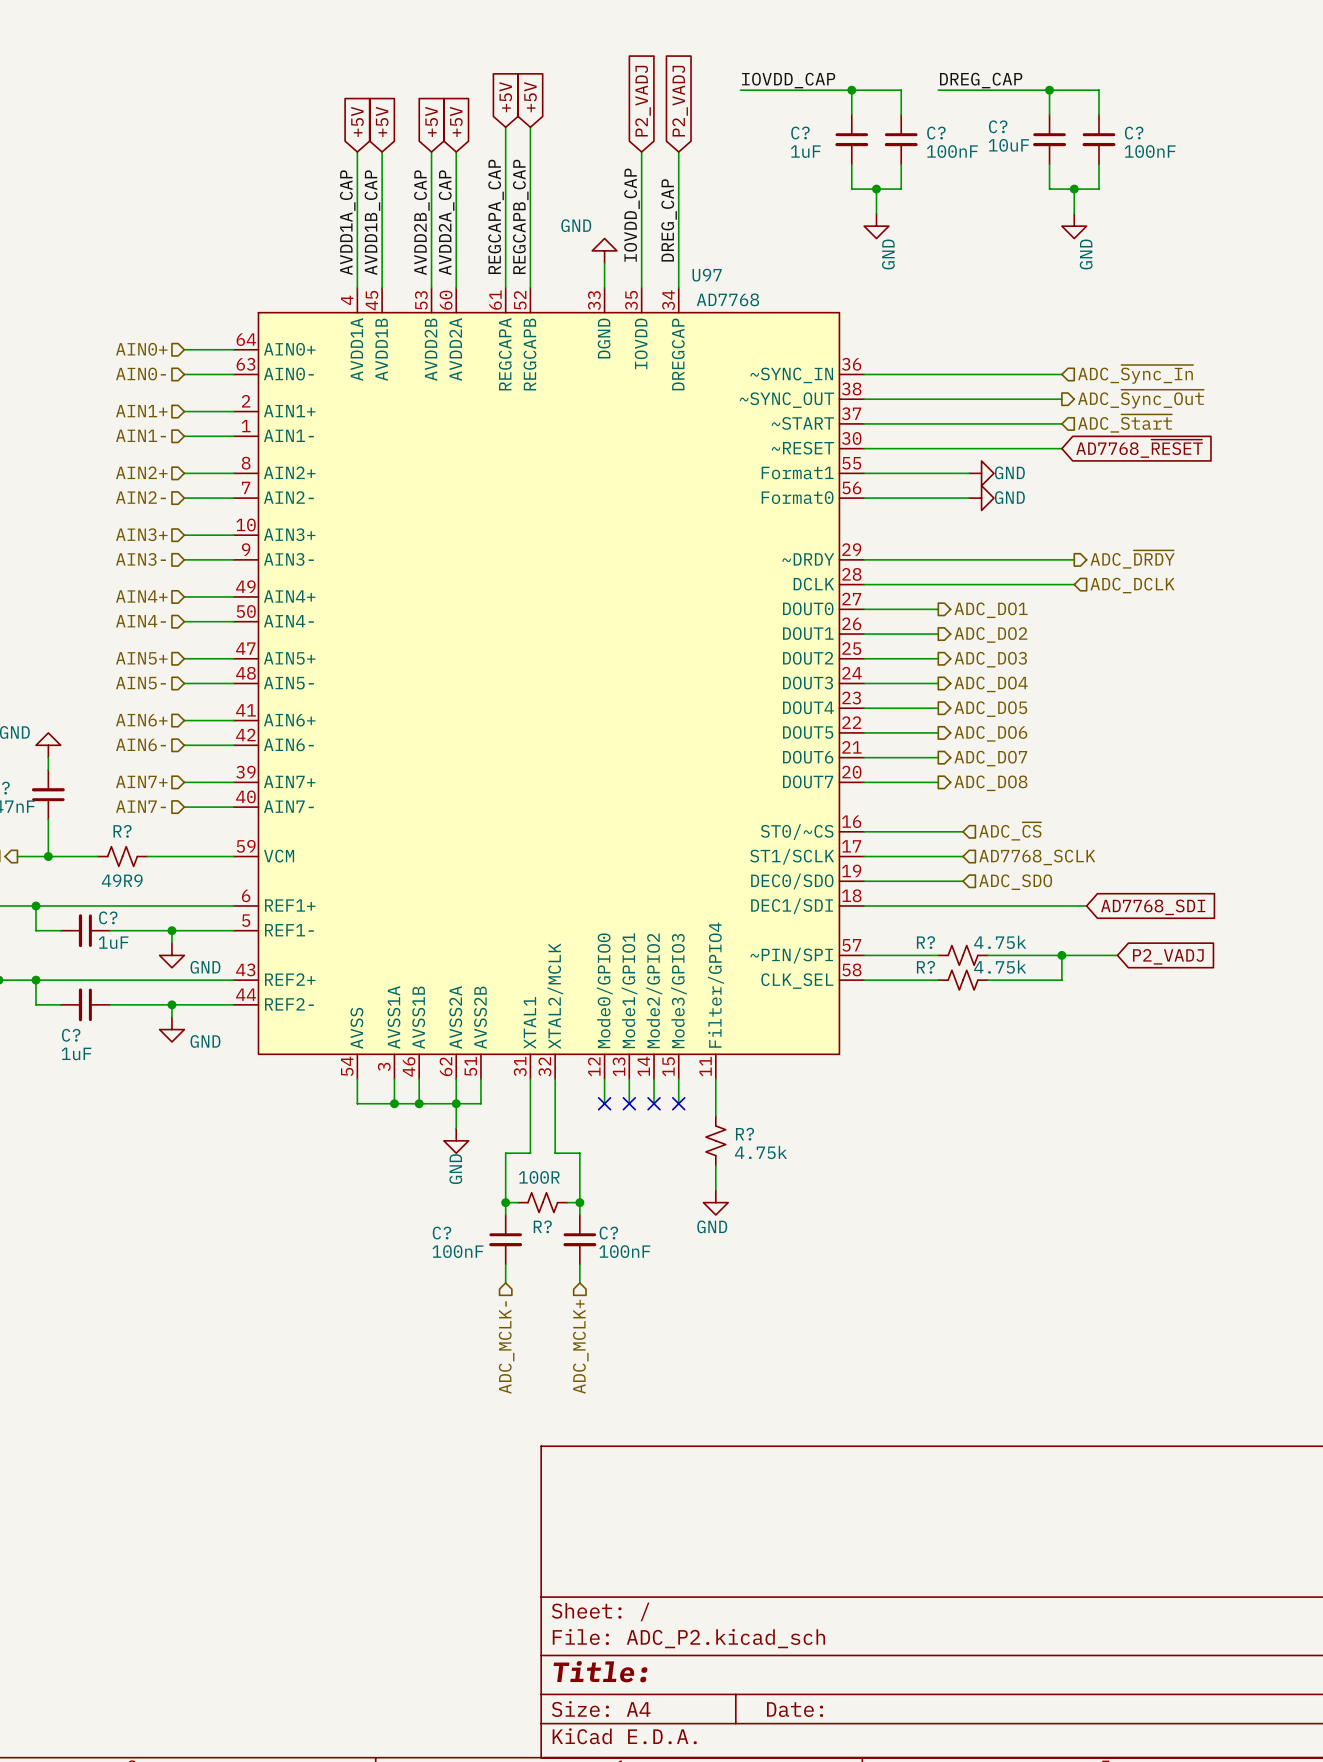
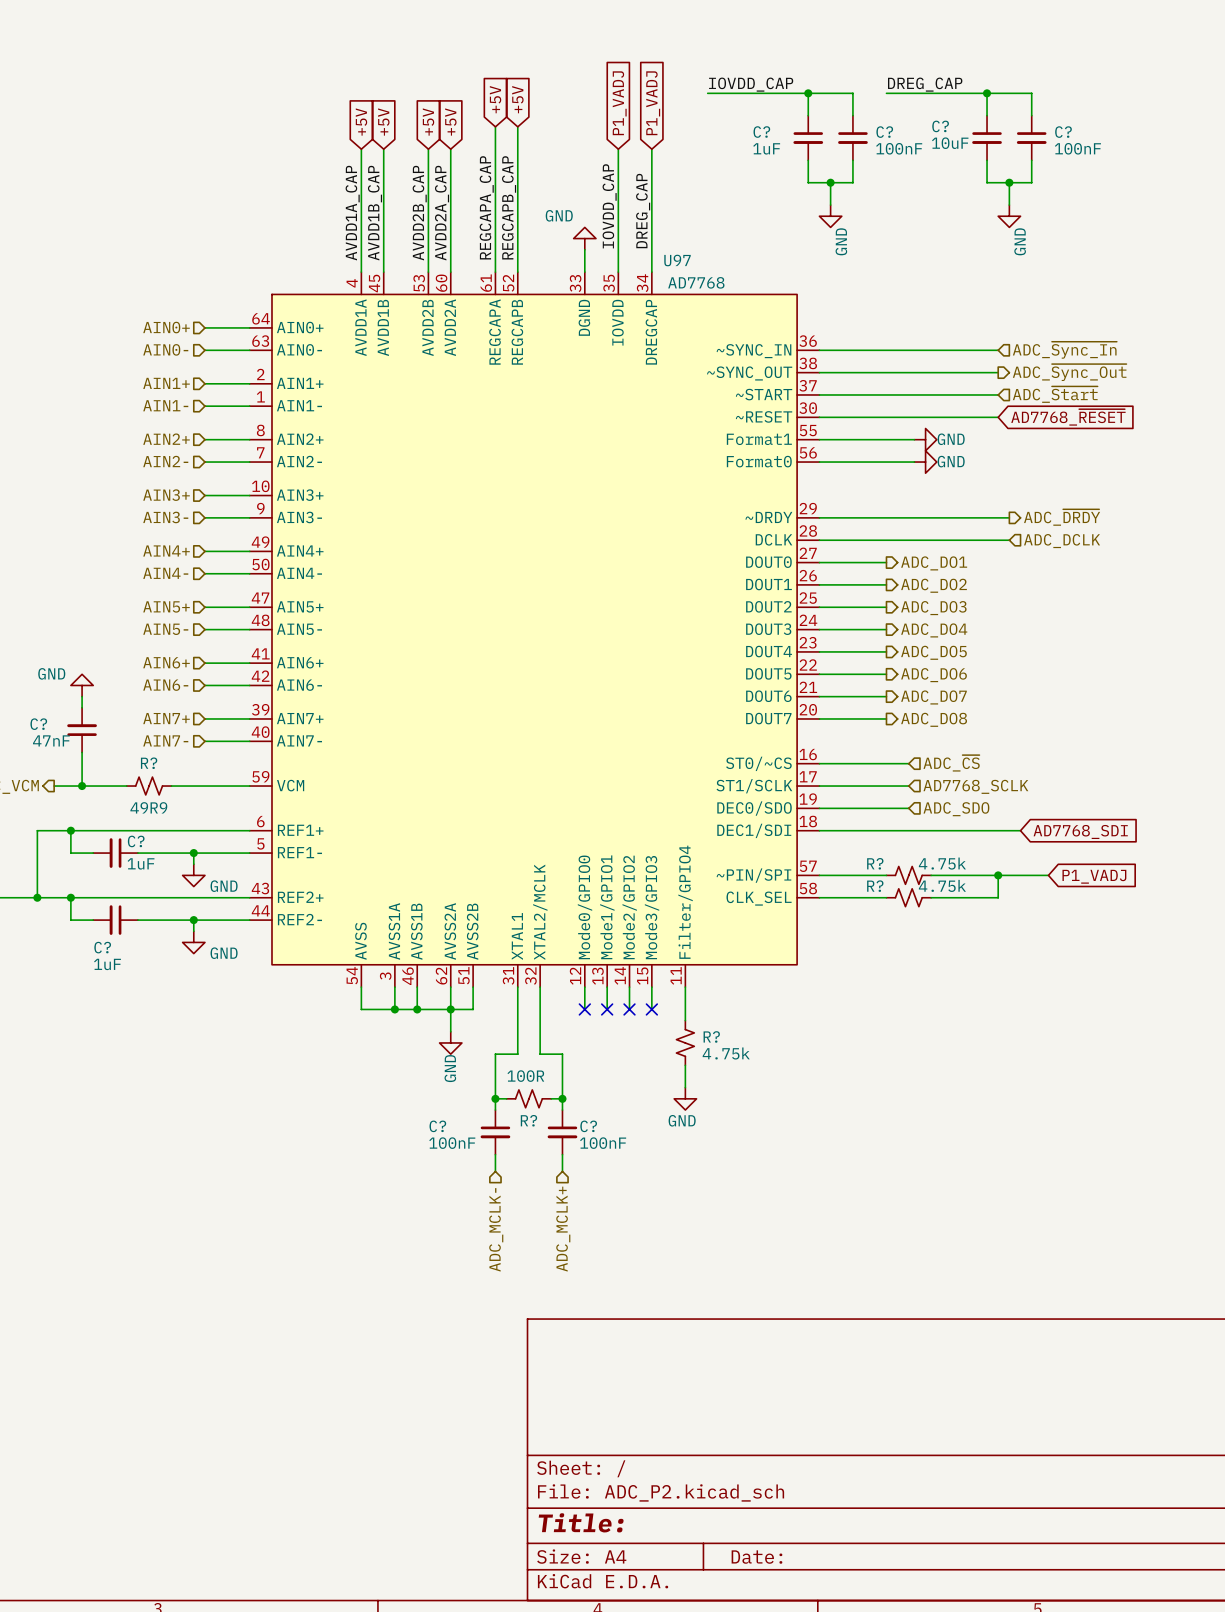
global label: P2_VADJ (643, 101) -> P1_VADJ (619, 103)
global label: P2_VADJ (680, 101) -> P1_VADJ (653, 103)
global label: P2_VADJ (1168, 956) -> P1_VADJ (1094, 876)

